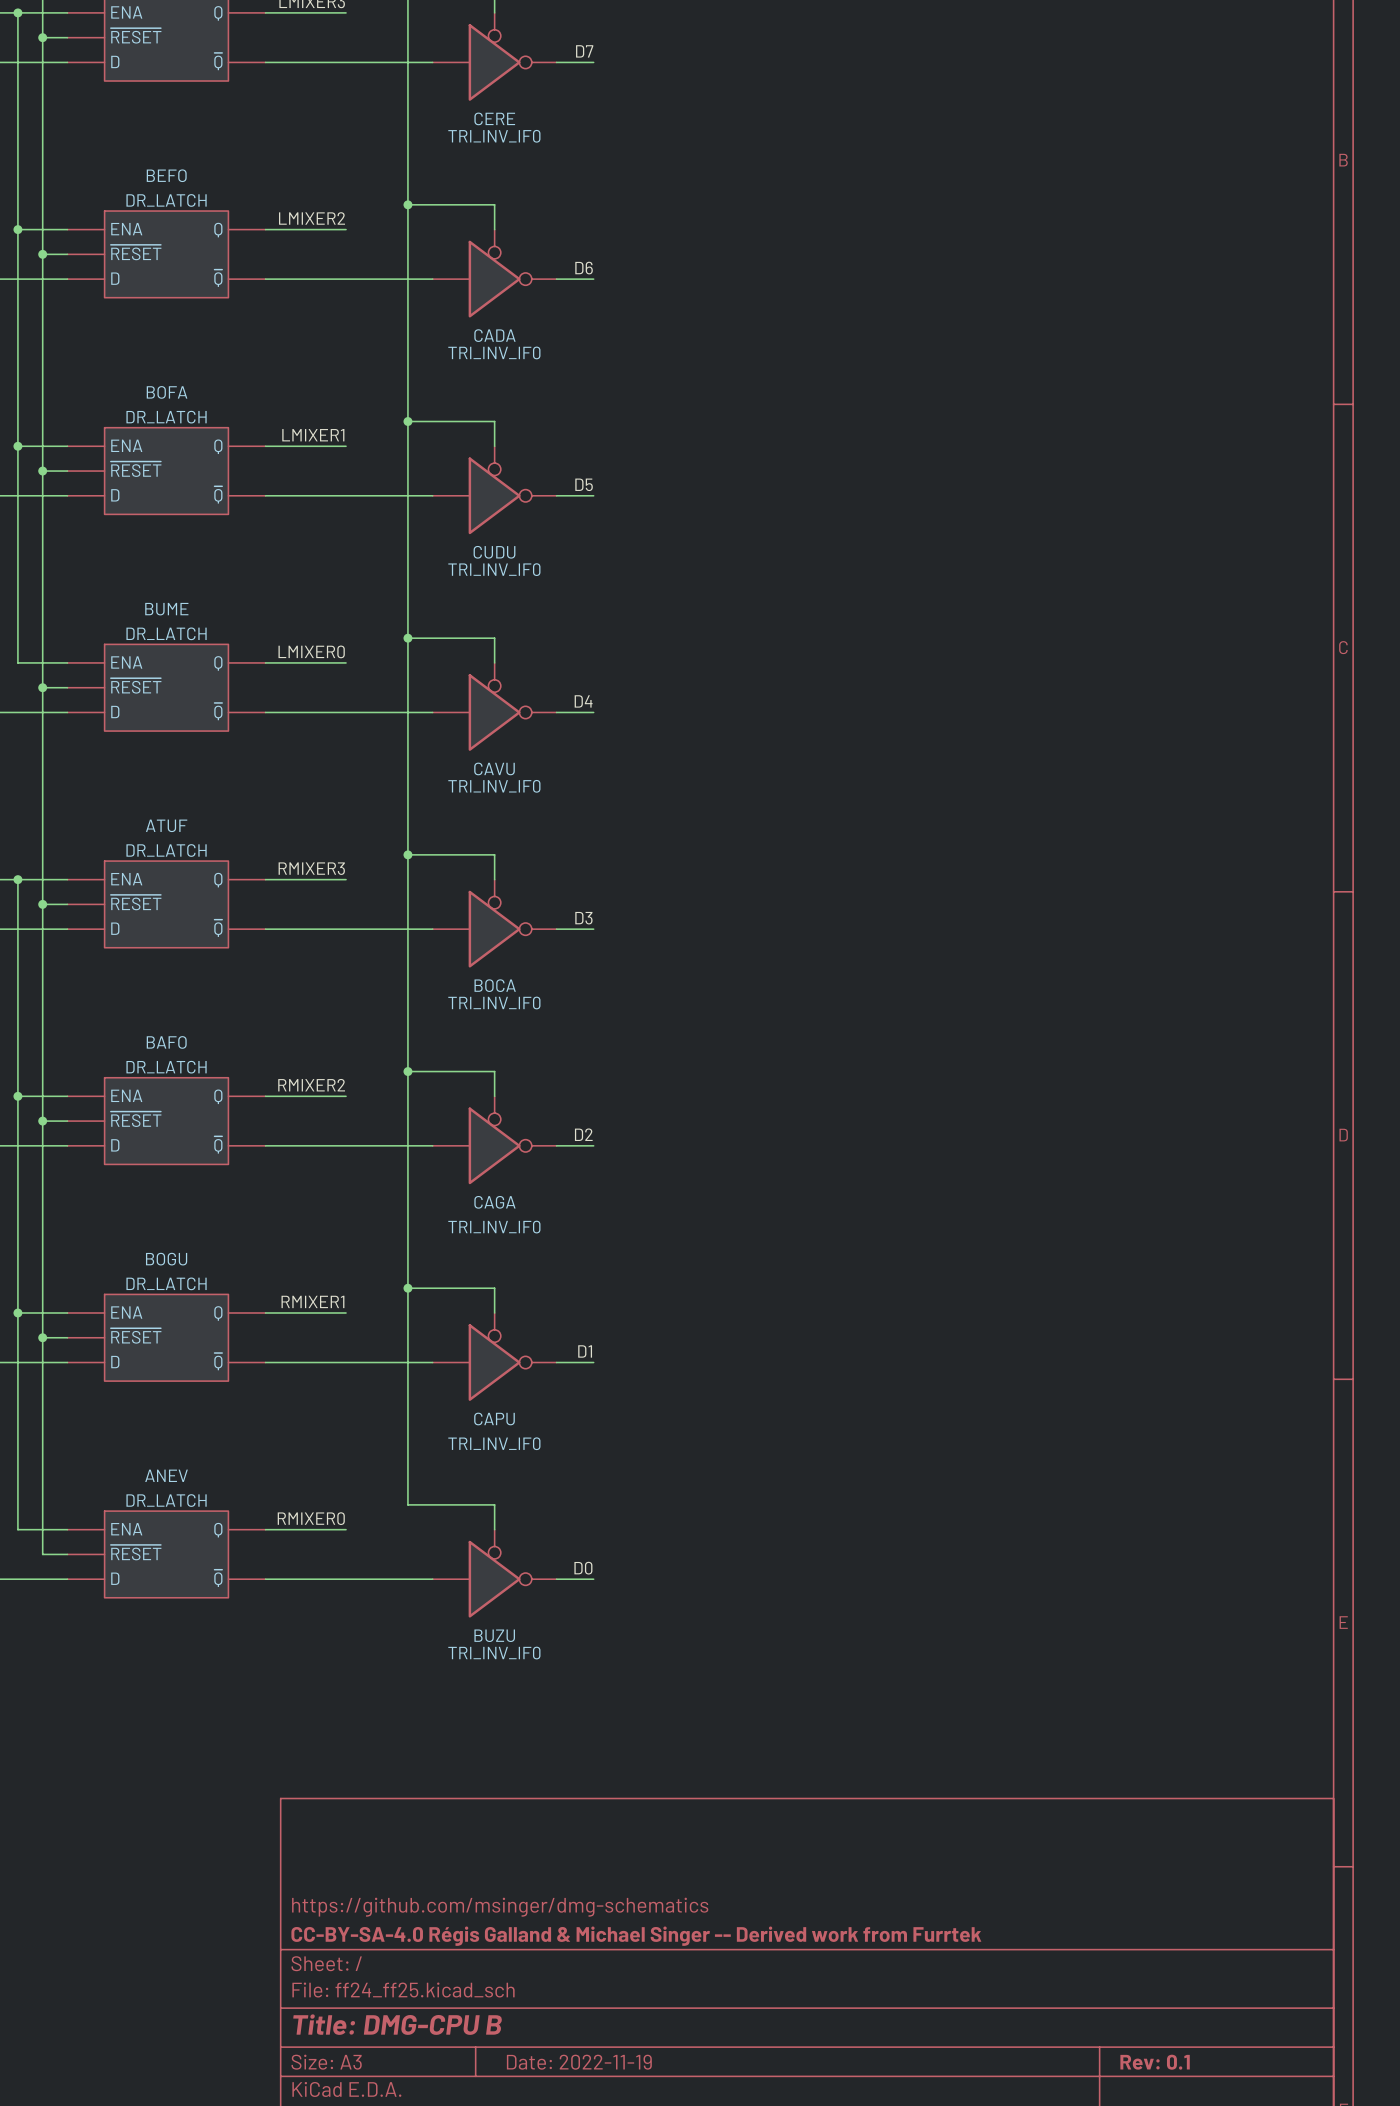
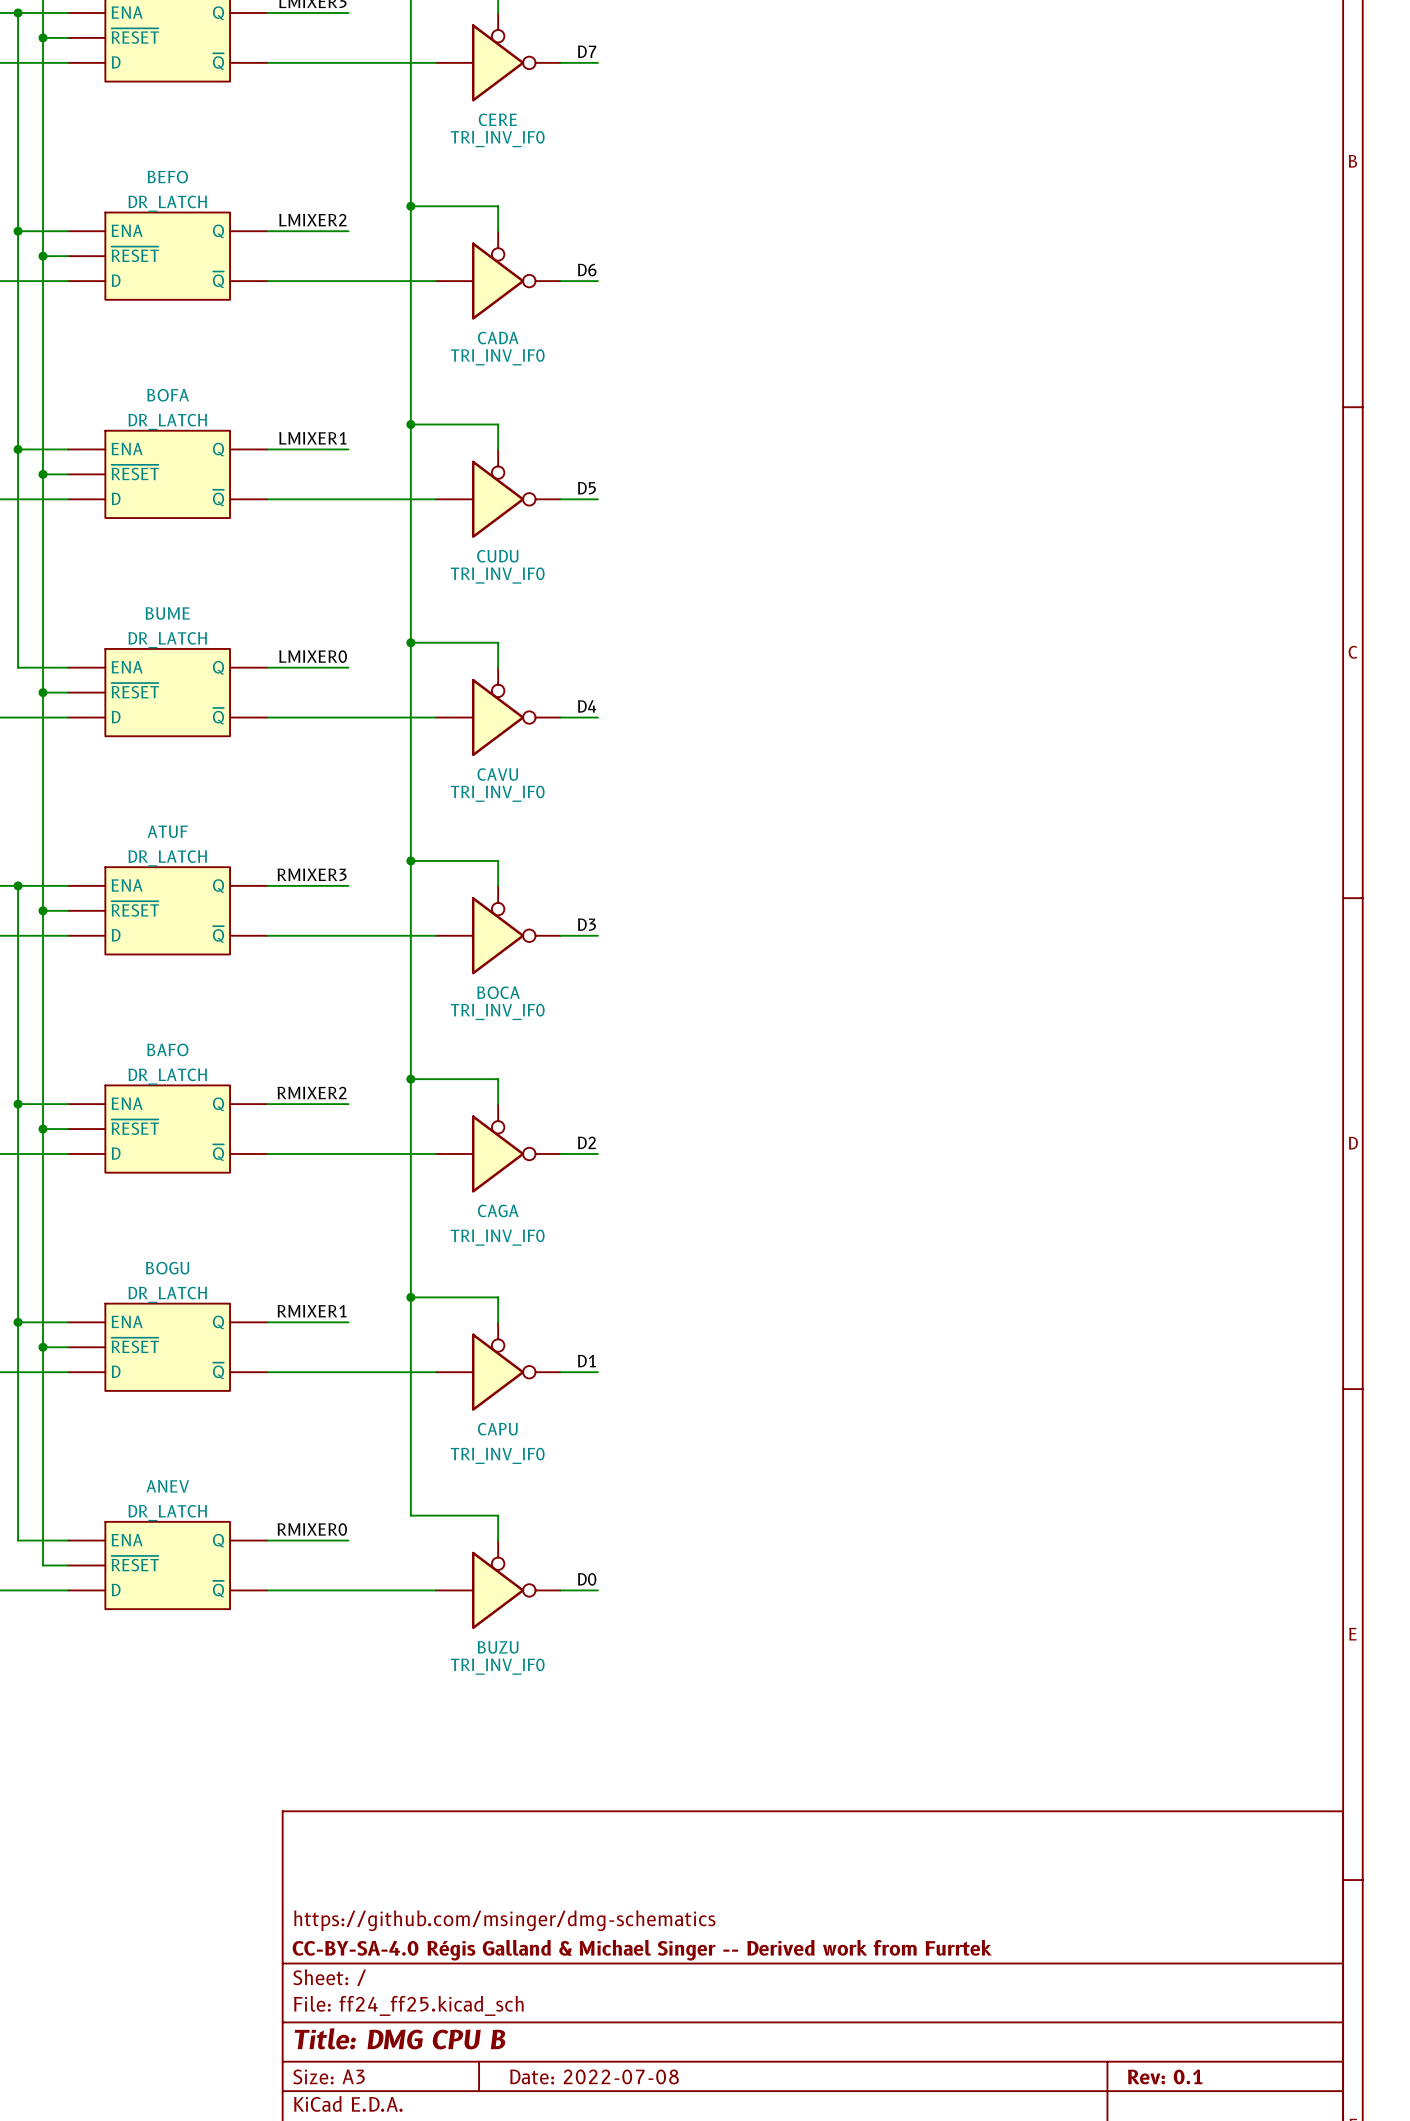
title block: Title: DMG-CPU B (397, 2024) -> Title: DMG CPU B (399, 2038)
title block: Date: 2022-11-19 (579, 2062) -> Date: 2022-07-08 (594, 2076)

